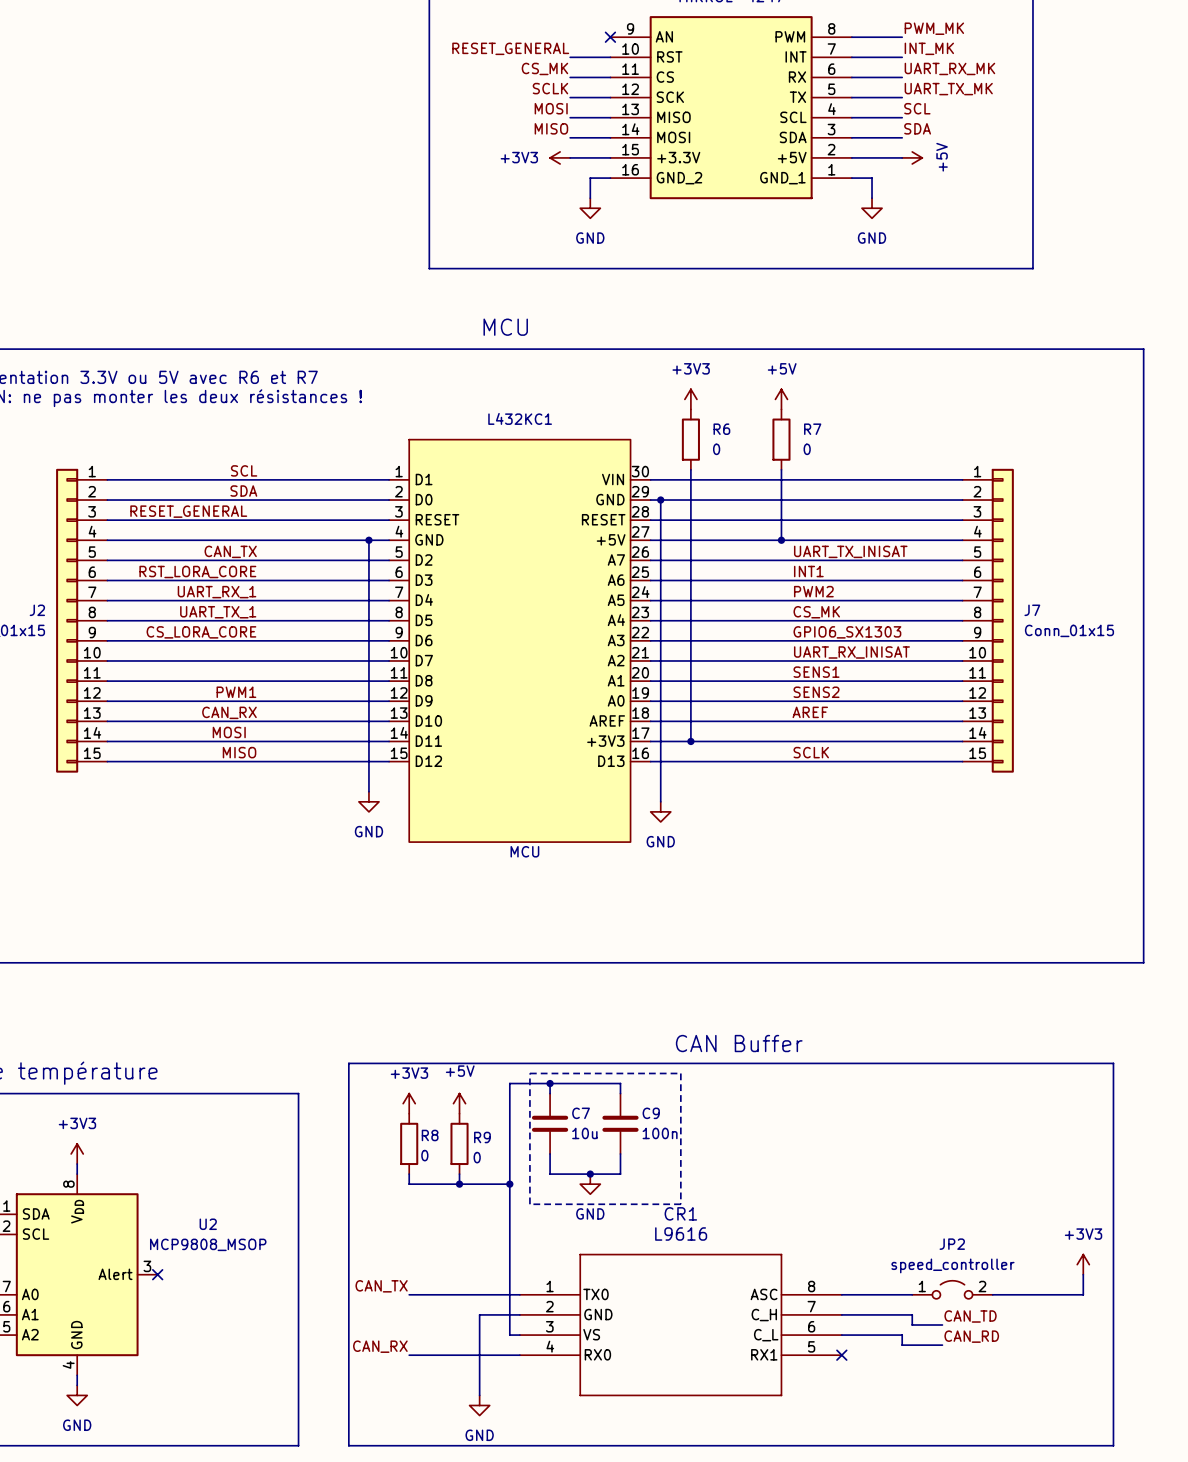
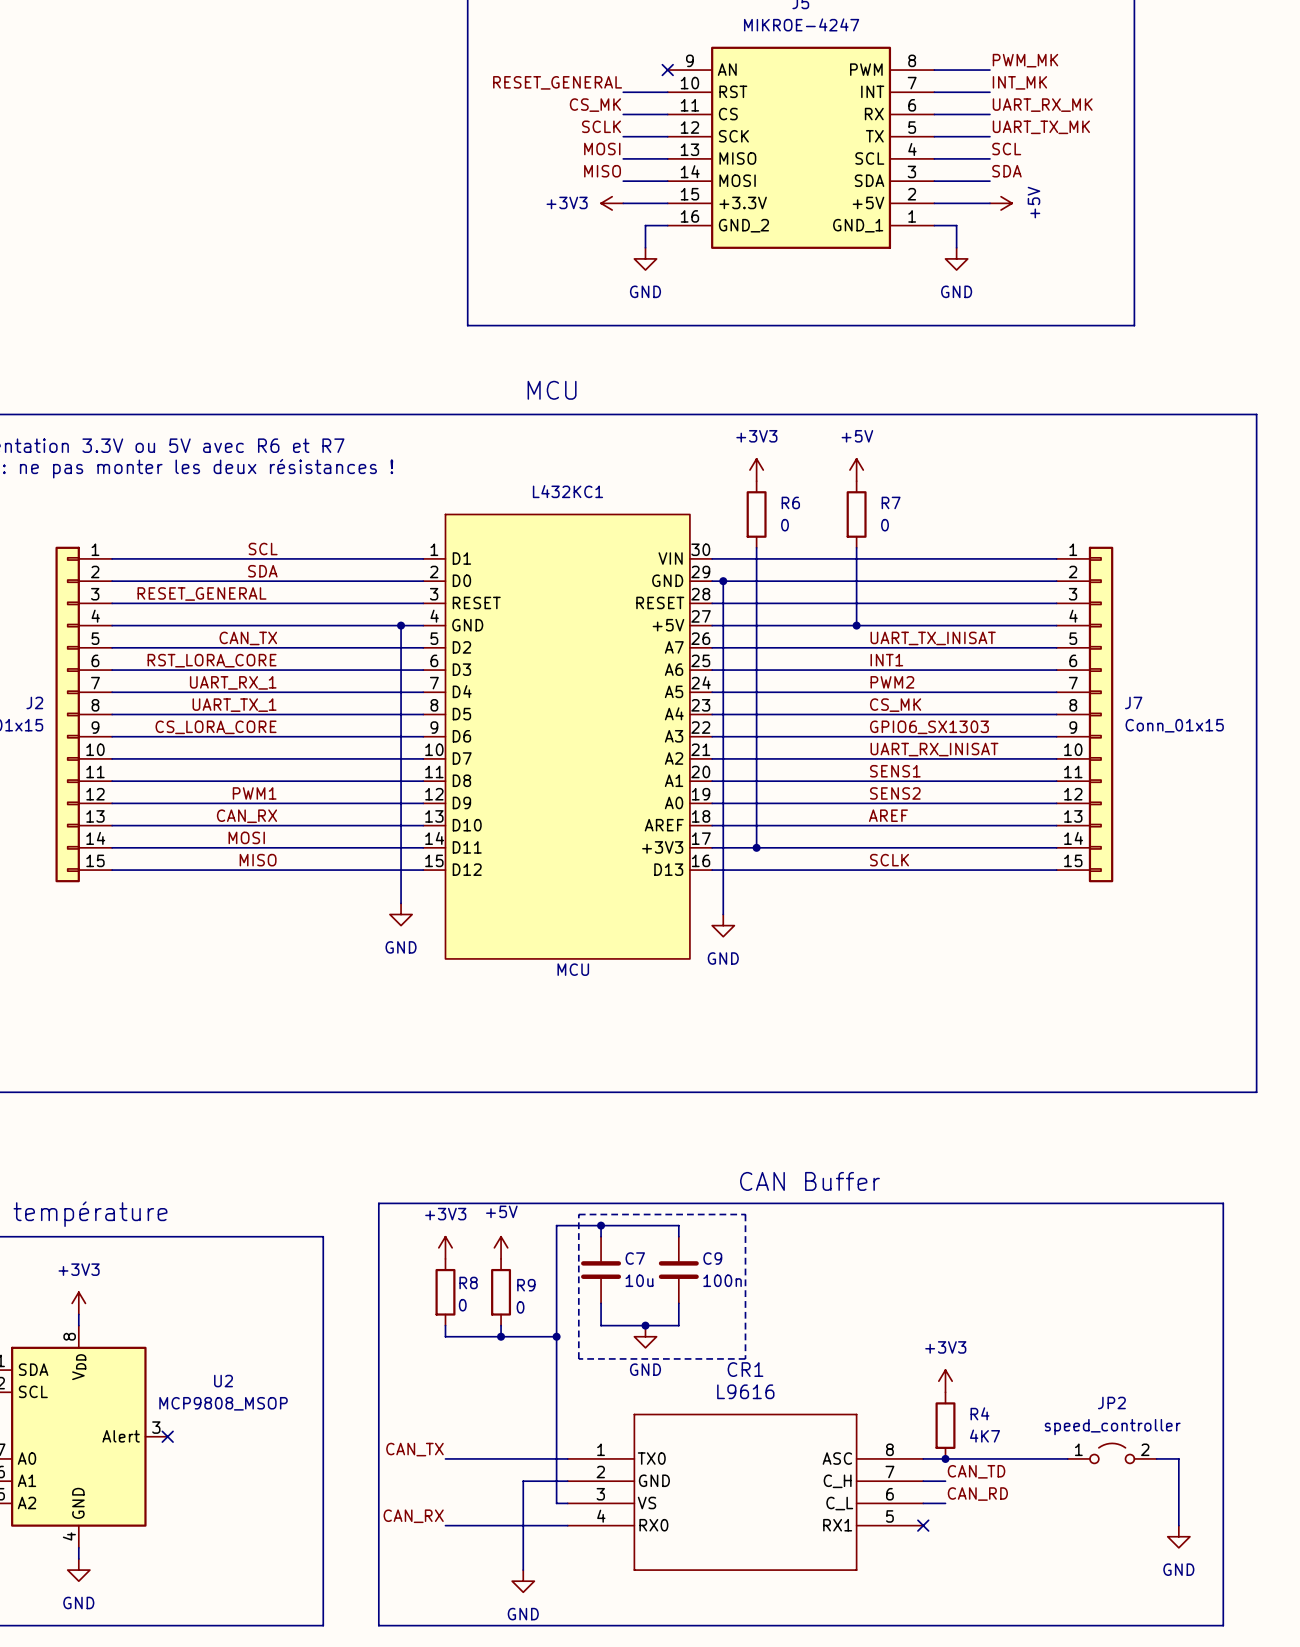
power symbol: none -> +3V3 (945, 1381)
R4: none -> 4K7 (945, 1425)
power symbol: +3V3 (1083, 1264) -> none
wire: (1083, 1274) (1083, 1294) (1073, 1294) -> (1178, 1525) (1178, 1458)
JP2 position: (952, 1289) -> (1112, 1453)
junction: none -> (945, 1458)
wire: (992, 1294) (1053, 1294) -> (1001, 1458) (1067, 1458)
wire: (861, 1314) (912, 1314) (912, 1325) (942, 1325) -> none
label position: CAN_TD (970, 1316) -> CAN_TD (976, 1471)
wire: (861, 1335) (902, 1335) (902, 1345) (942, 1345) -> none
label position: CAN_RD (971, 1336) -> CAN_RD (977, 1494)
power symbol: none -> GND (1178, 1536)

